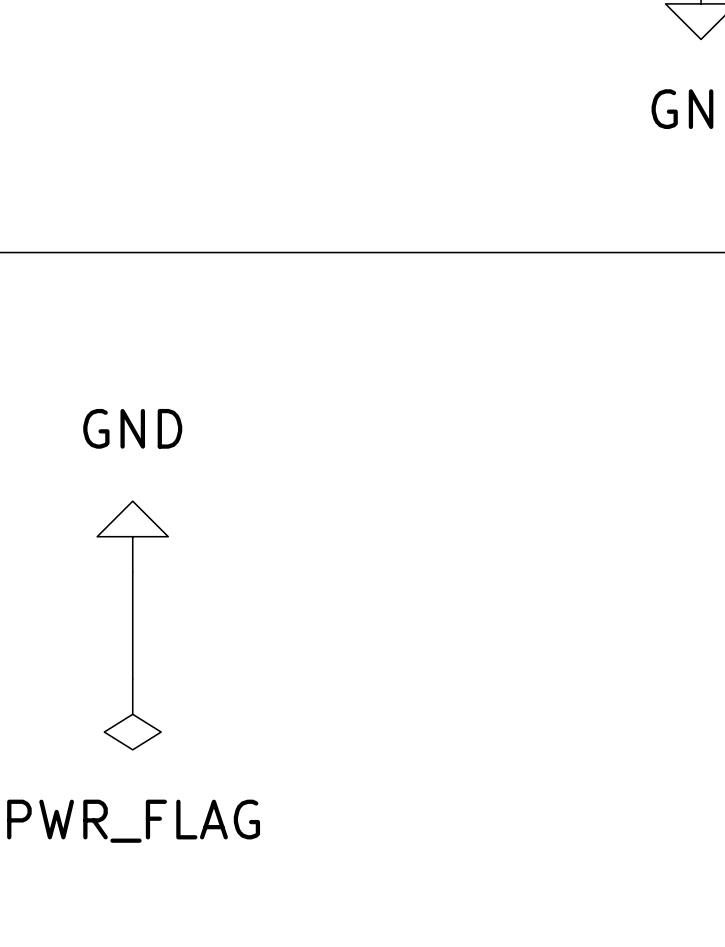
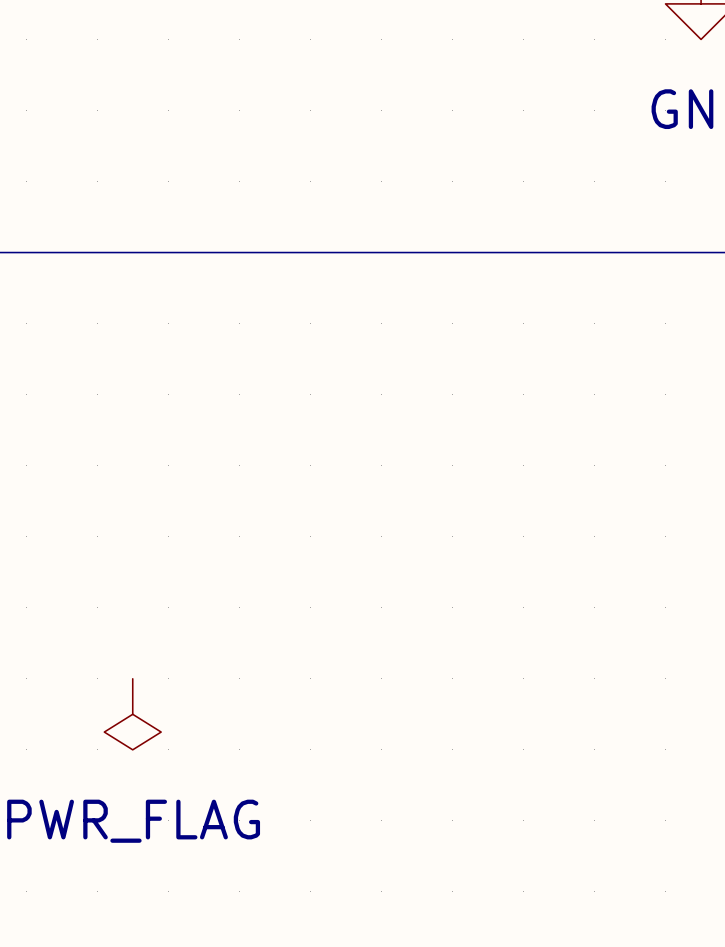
power symbol: GND (132, 536) -> none
wire: (132, 572) (132, 678) -> none

